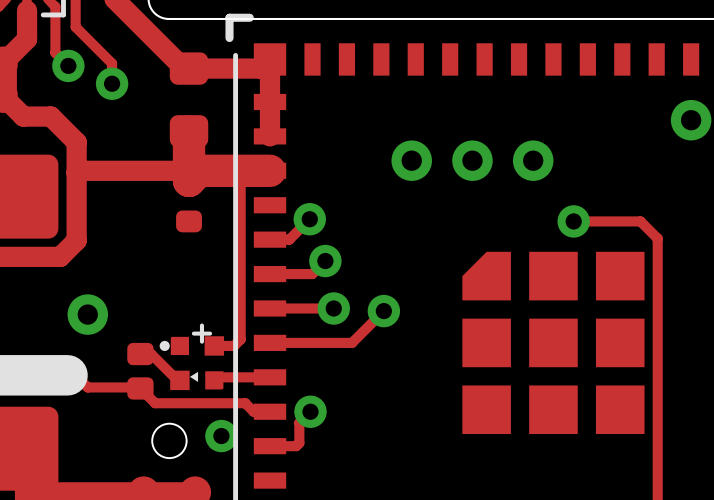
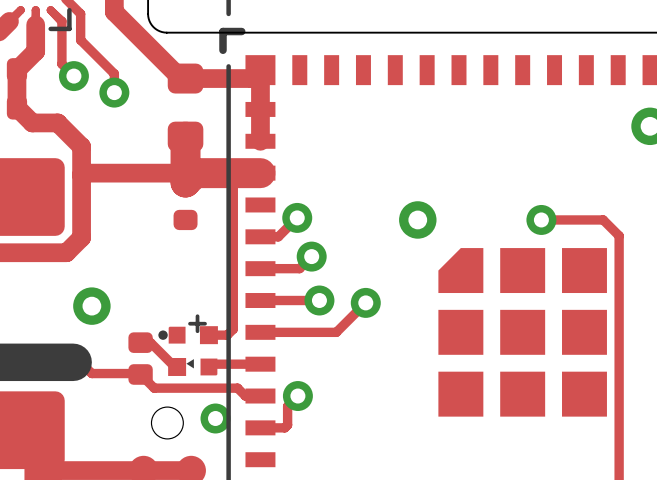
via: (411, 160) -> none
via: (472, 160) -> none
via: (533, 160) -> none
via: none -> (417, 219)

